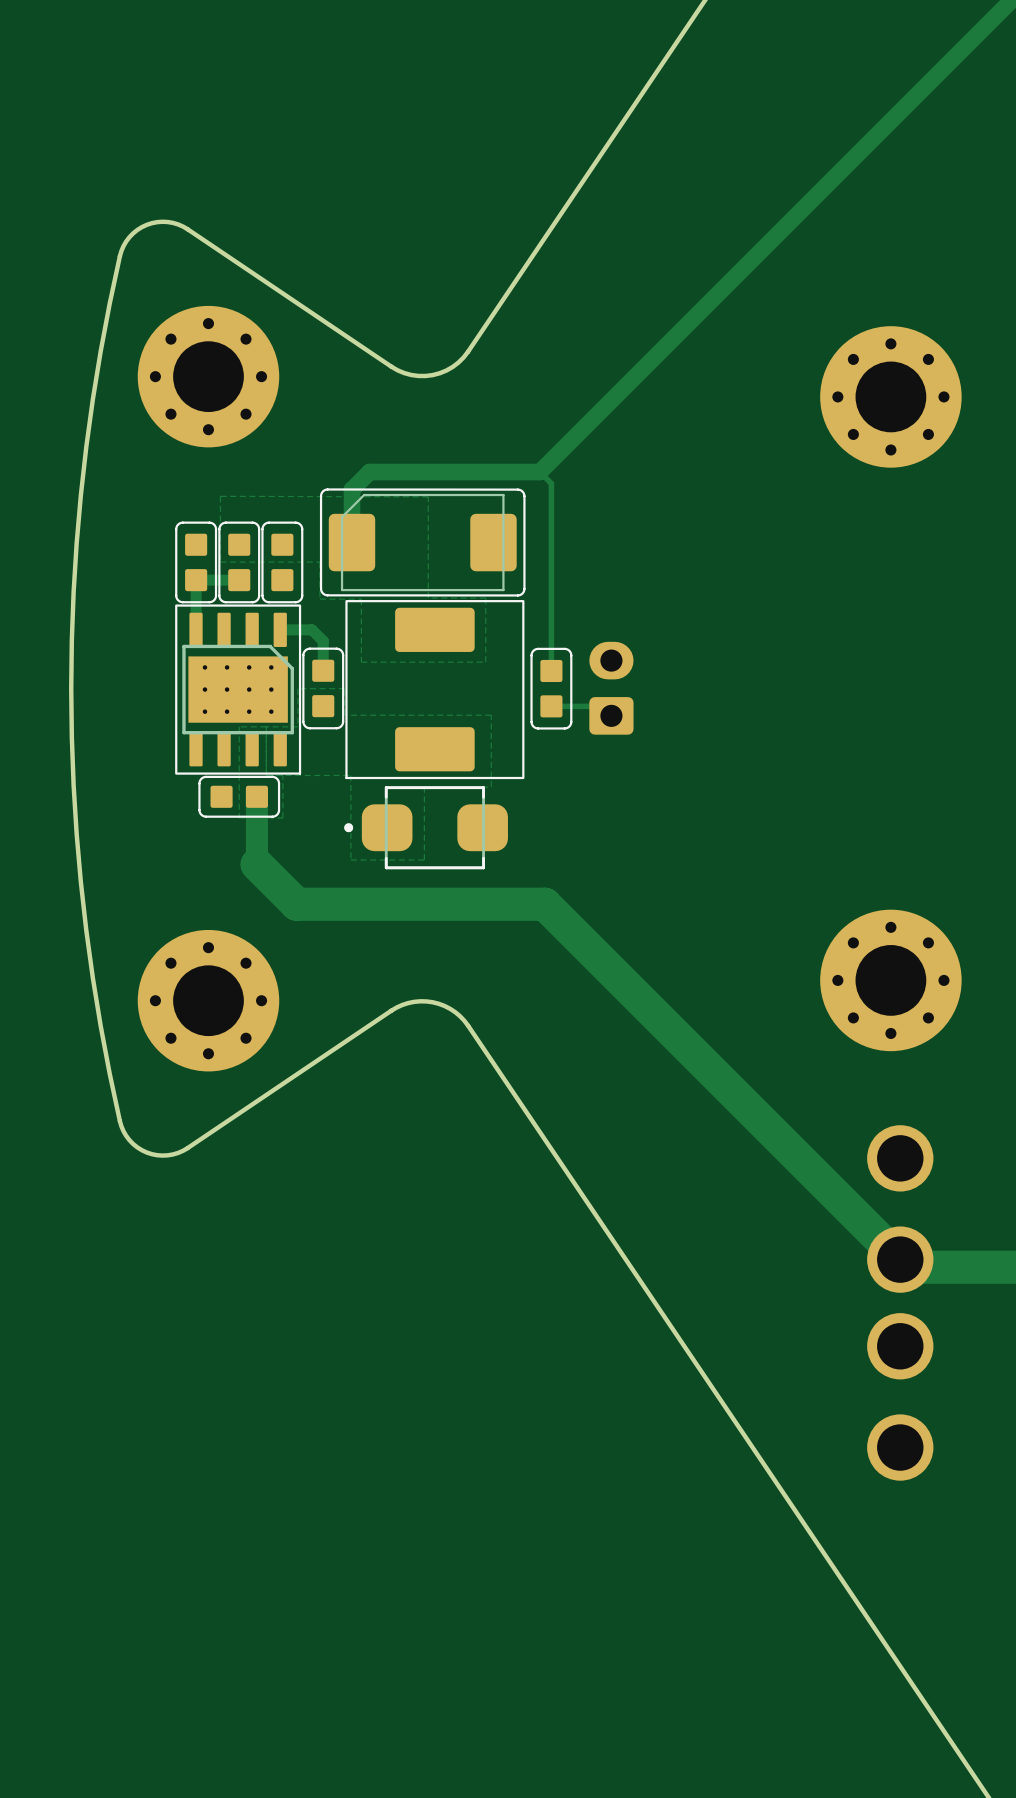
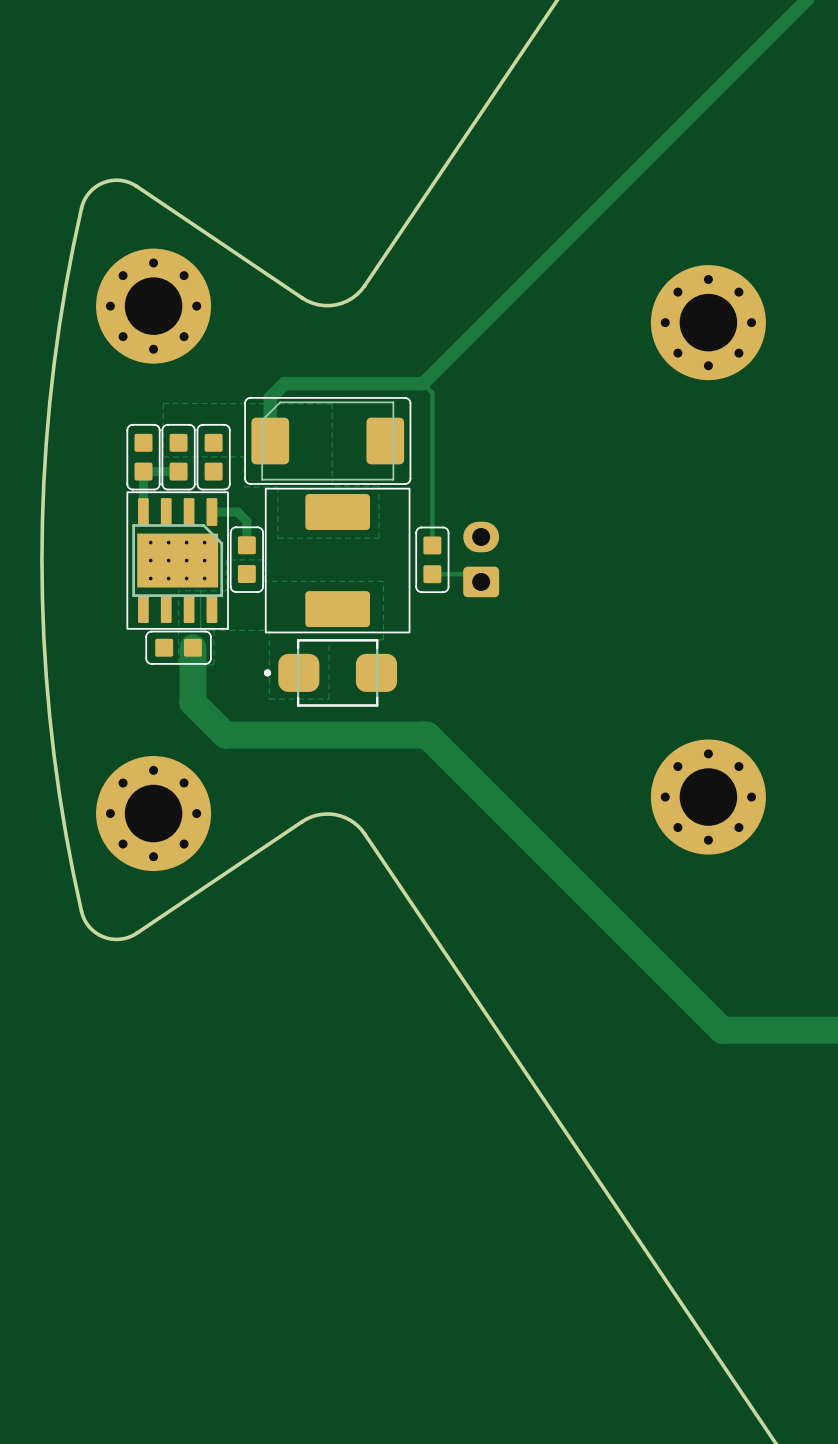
track width: thin (256, 796) (256, 864) -> thick (192, 647) (192, 702)
part: (900, 1208) -> none
part: (900, 1396) -> none

